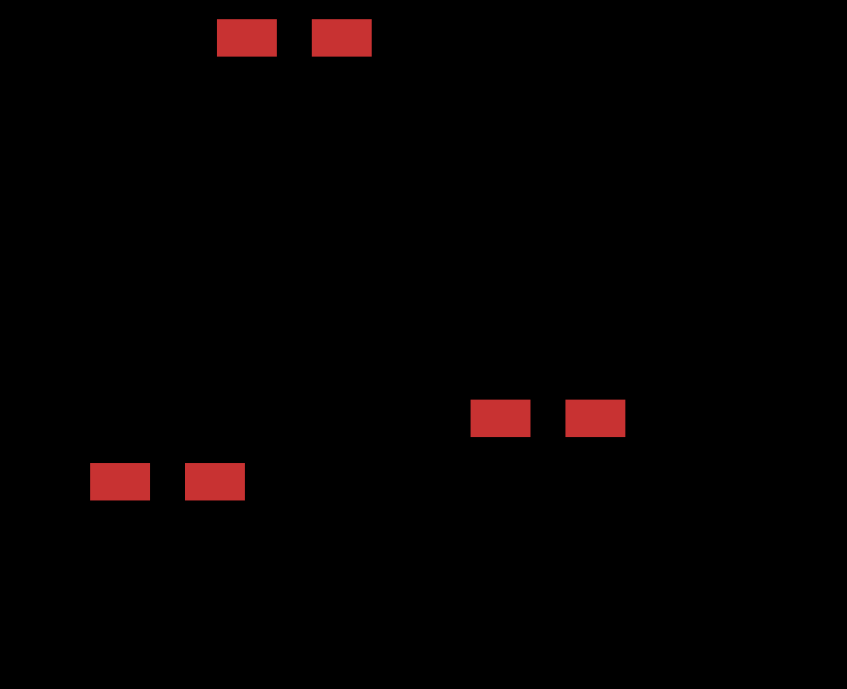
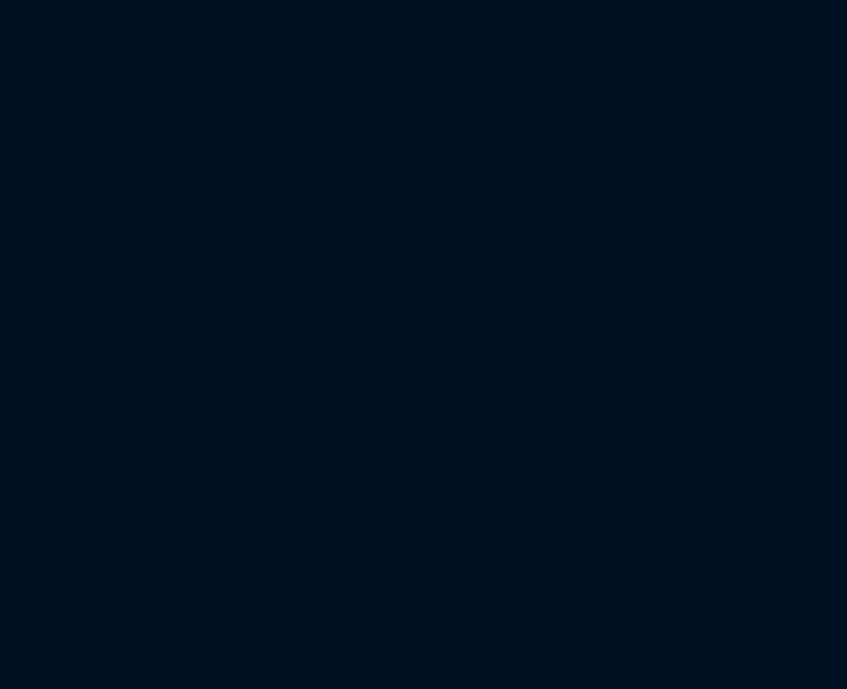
part: (294, 37) -> none
part: (547, 418) -> none
part: (167, 481) -> none

